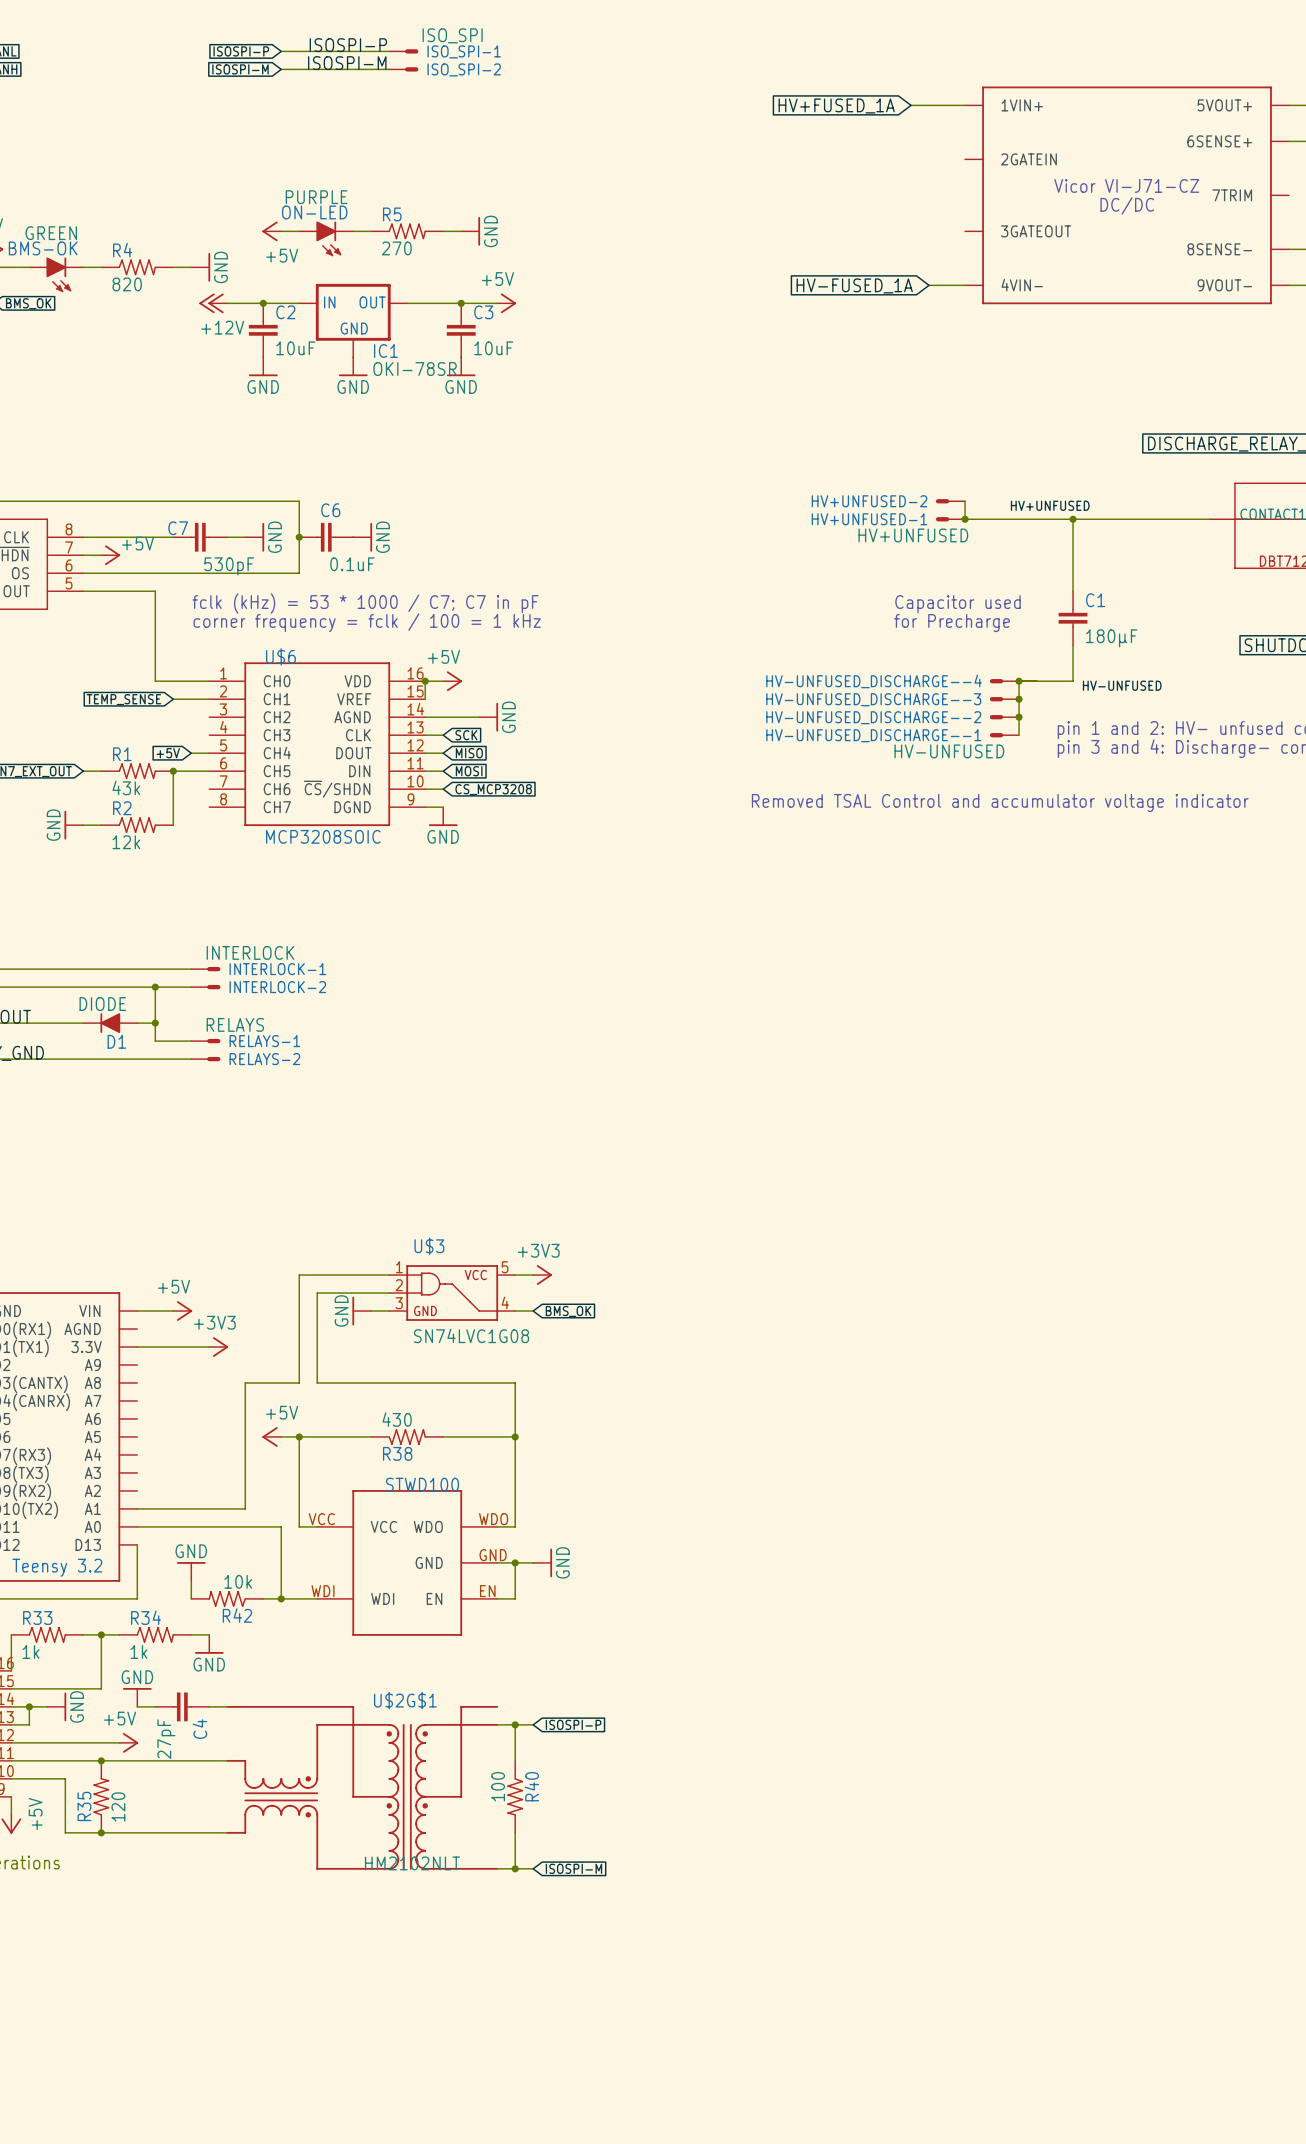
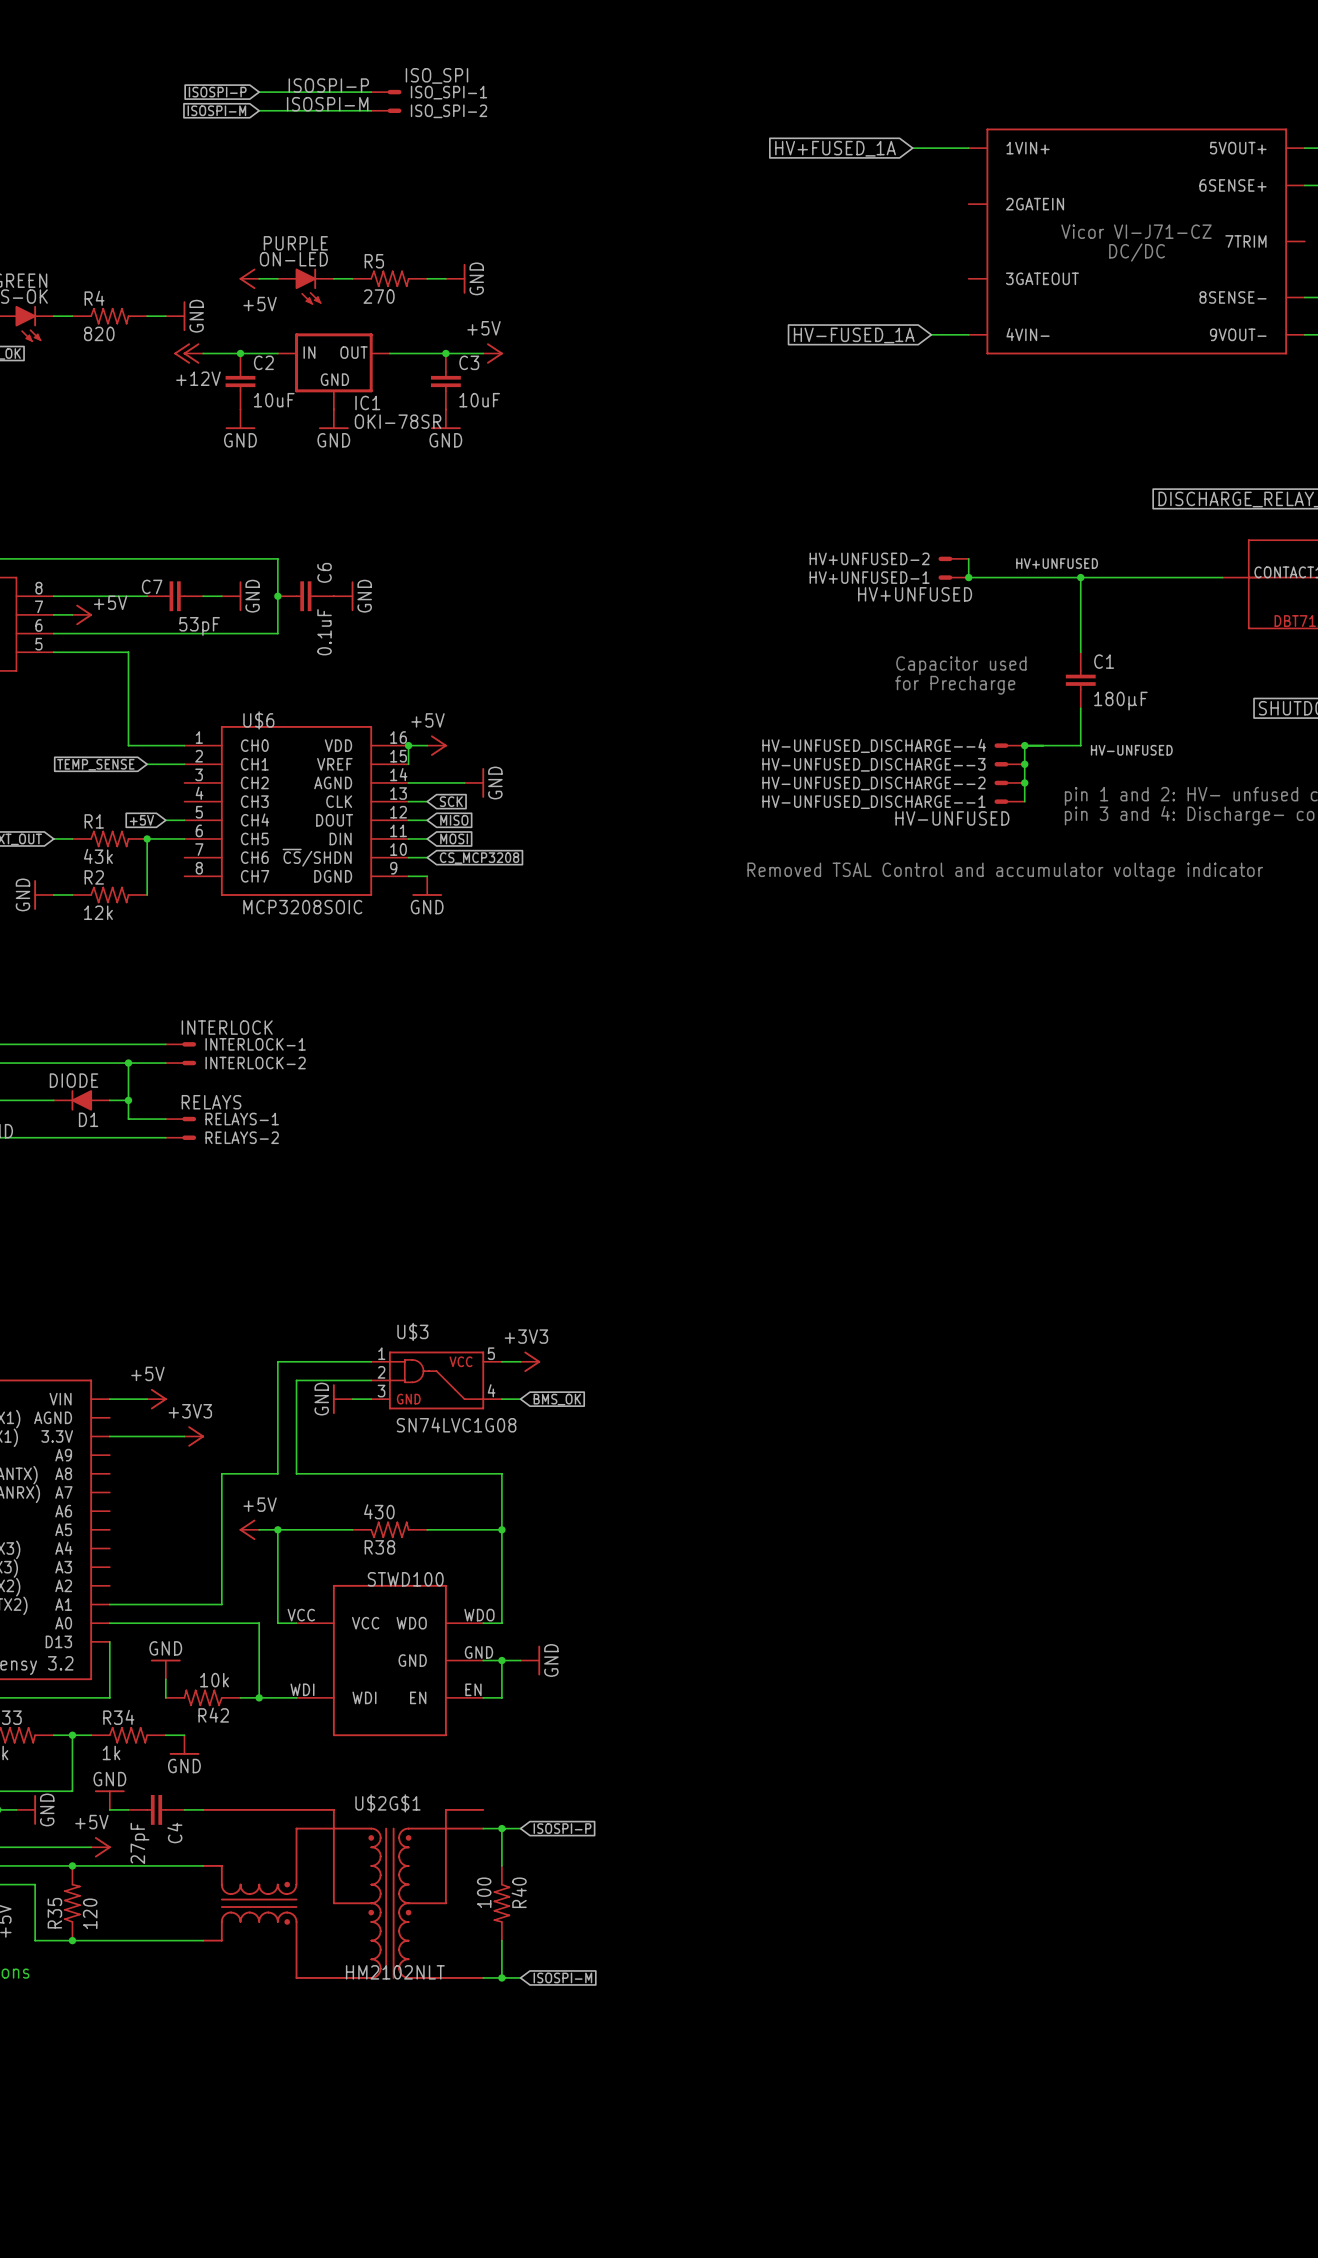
C6 name rotation: 0° (330, 510) -> 90° counterclockwise (324, 572)
C6 value rotation: 0° (352, 564) -> 90° counterclockwise (324, 632)
C7 value: 530pF (229, 566) -> 53pF (199, 626)
text: fclk (kHz) = 53 * 1000 / C7; C7 in pF (365, 603) -> none
text: corner frequency = fclk / 100 = 1 kHz (367, 622) -> none

